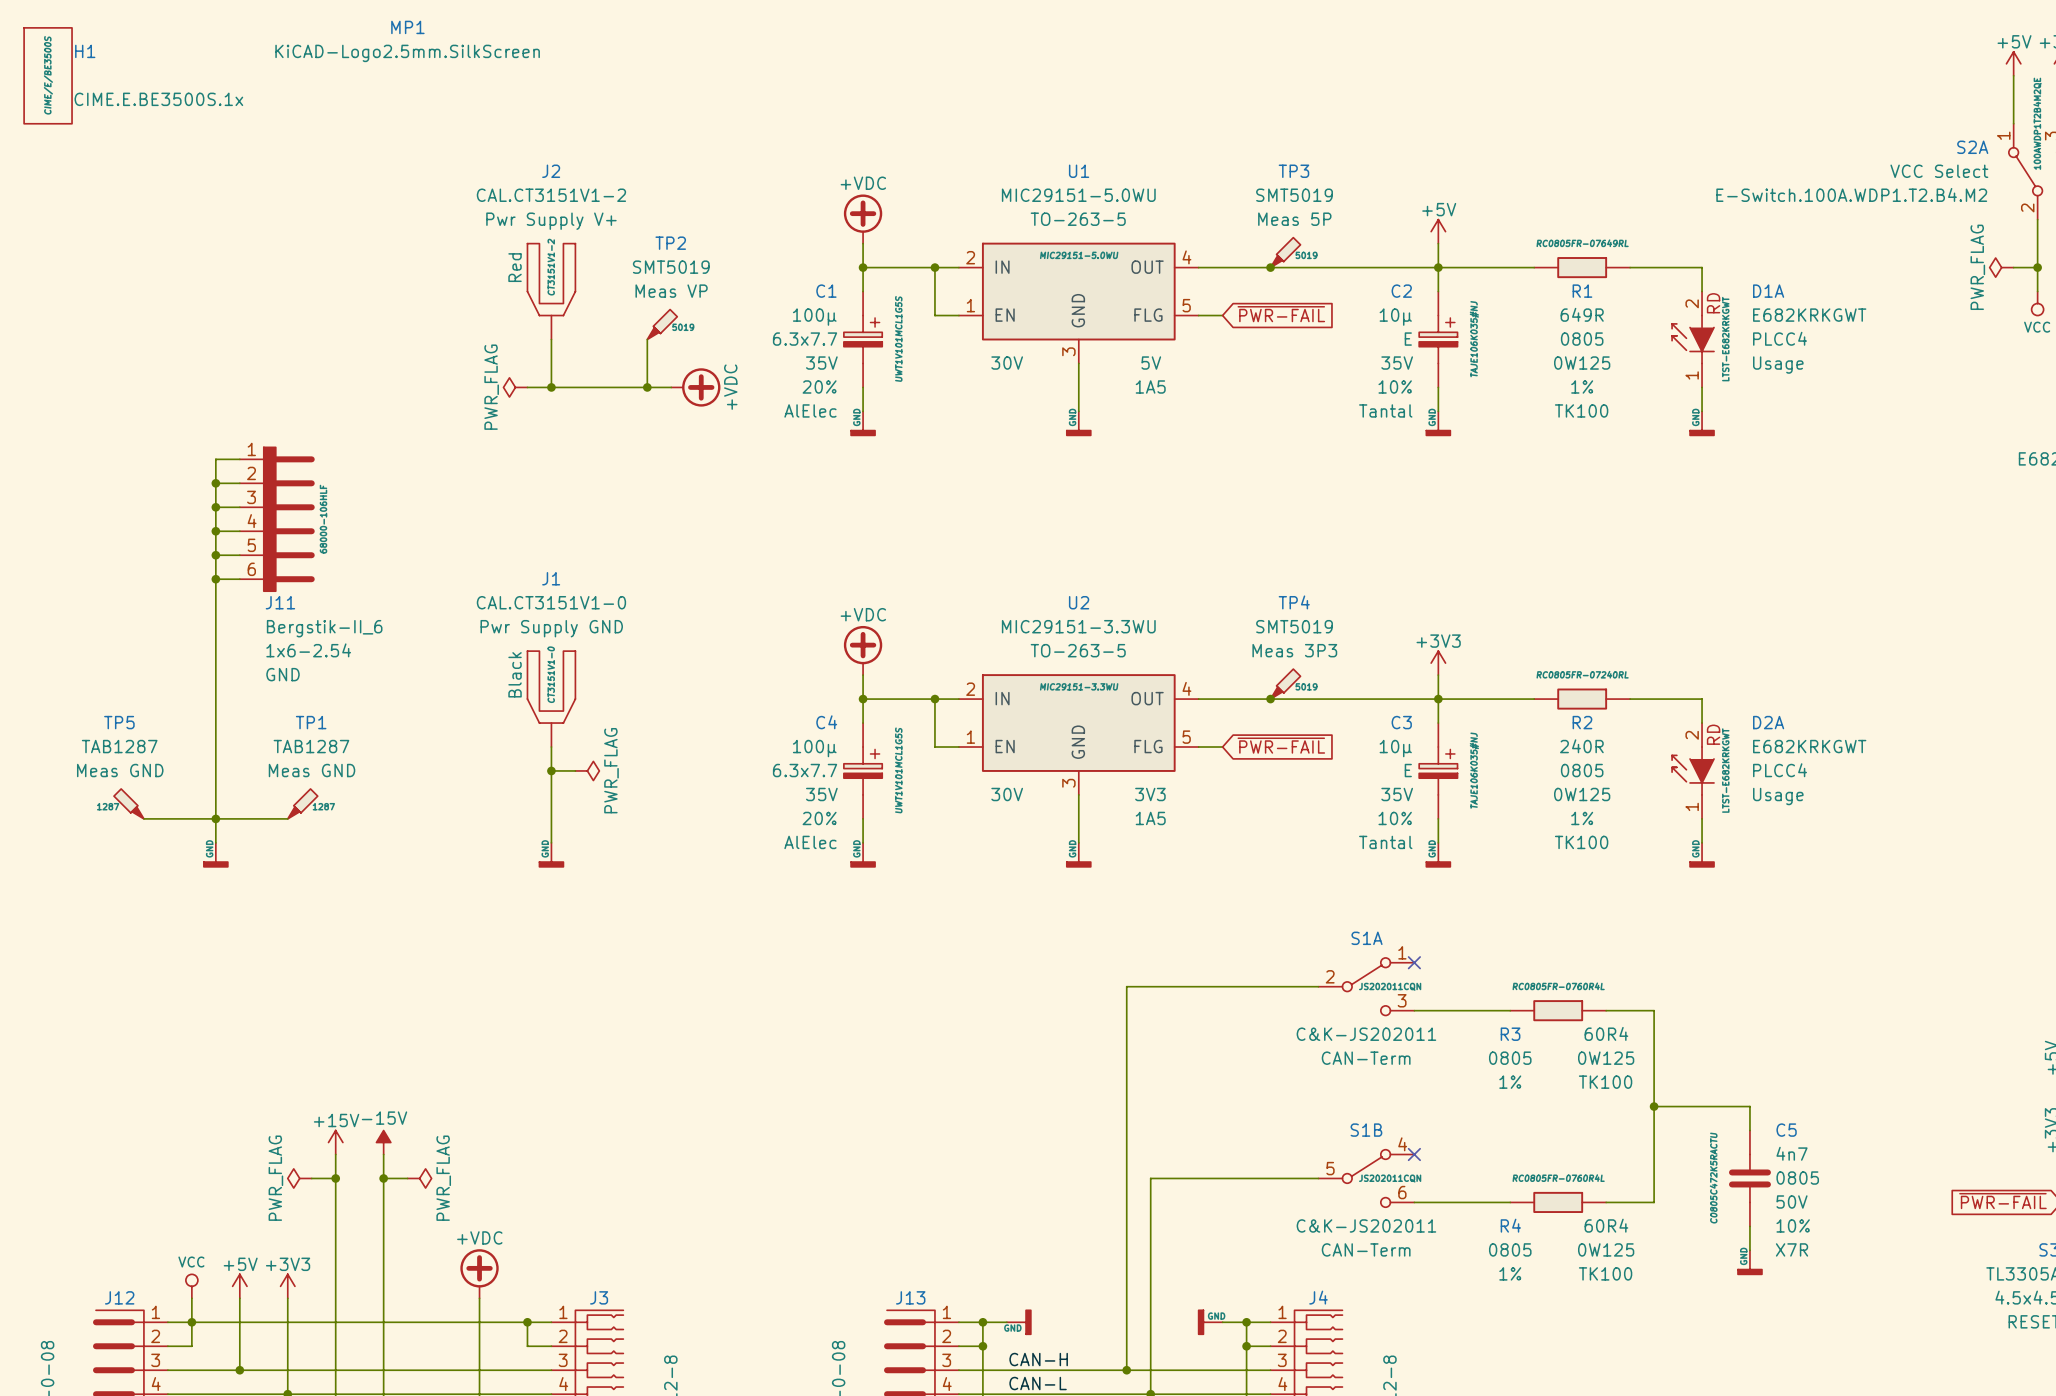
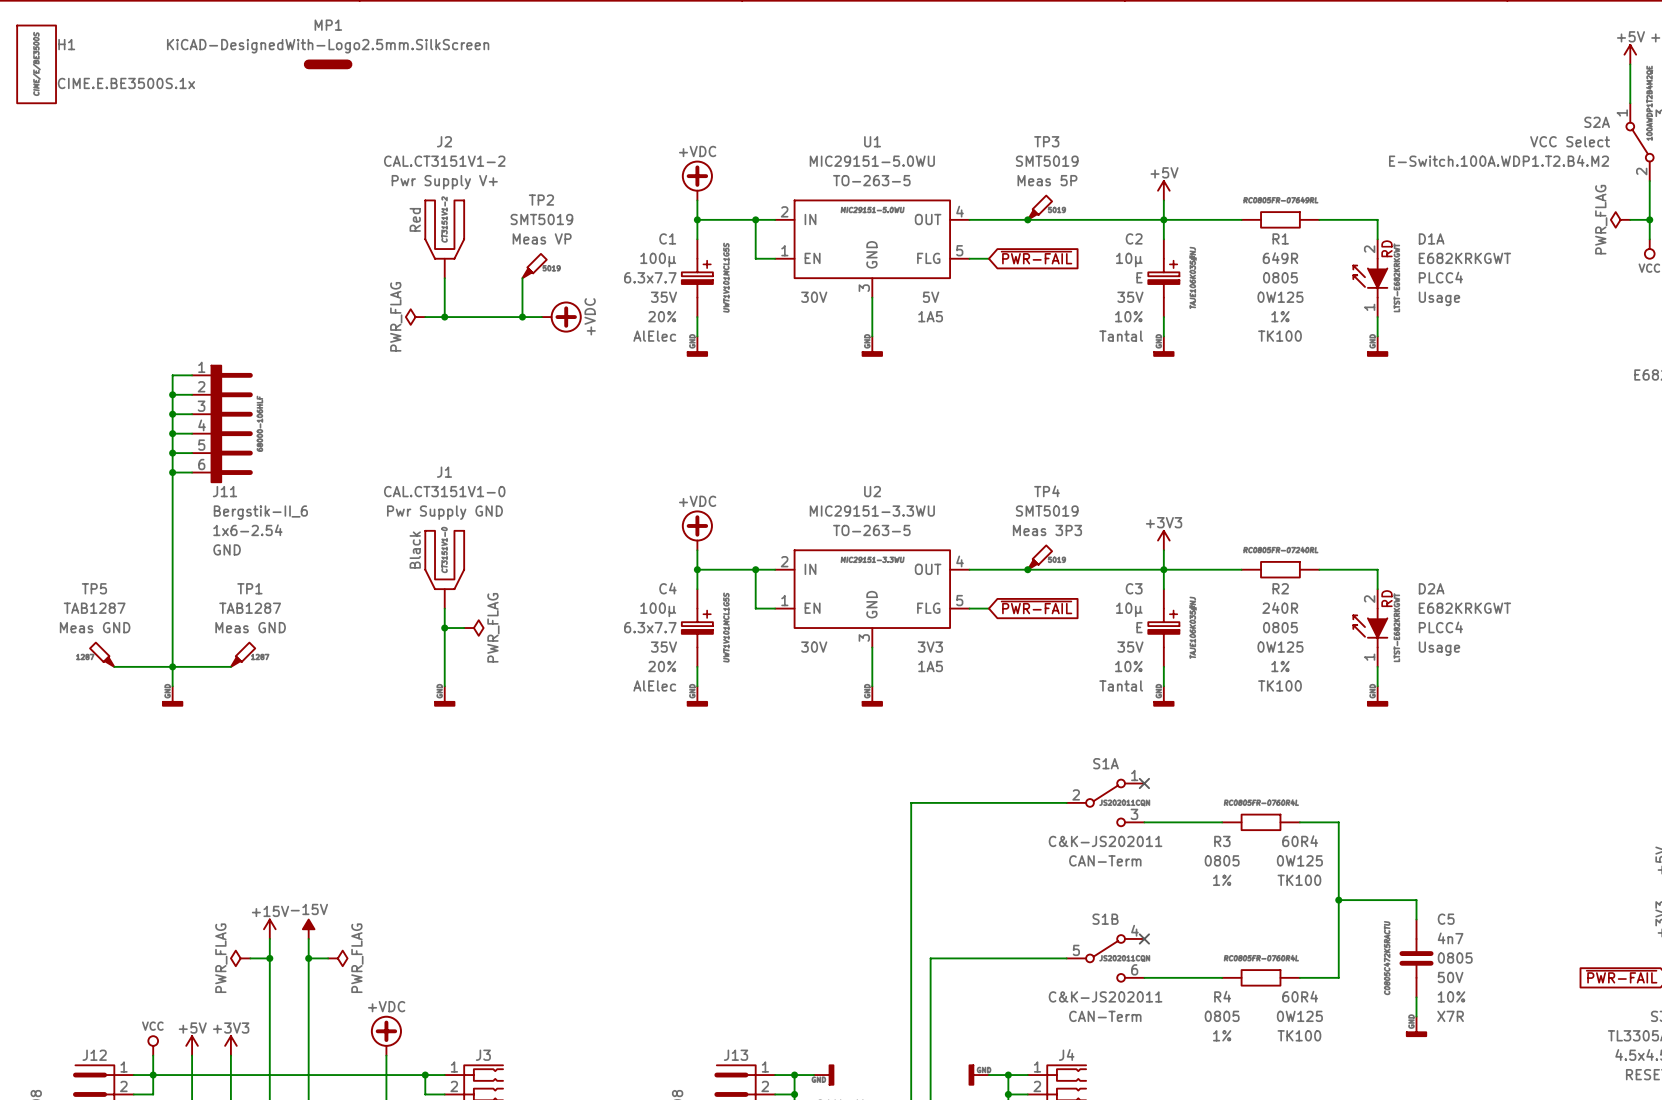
MP1 symbol: [275, 20, 540, 63] -> [303, 59, 353, 70]
MP1 value: KiCAD-Logo2.5mm.SilkScreen (407, 53) -> KiCAD-DesignedWith-Logo2.5mm.SilkScreen (328, 46)

